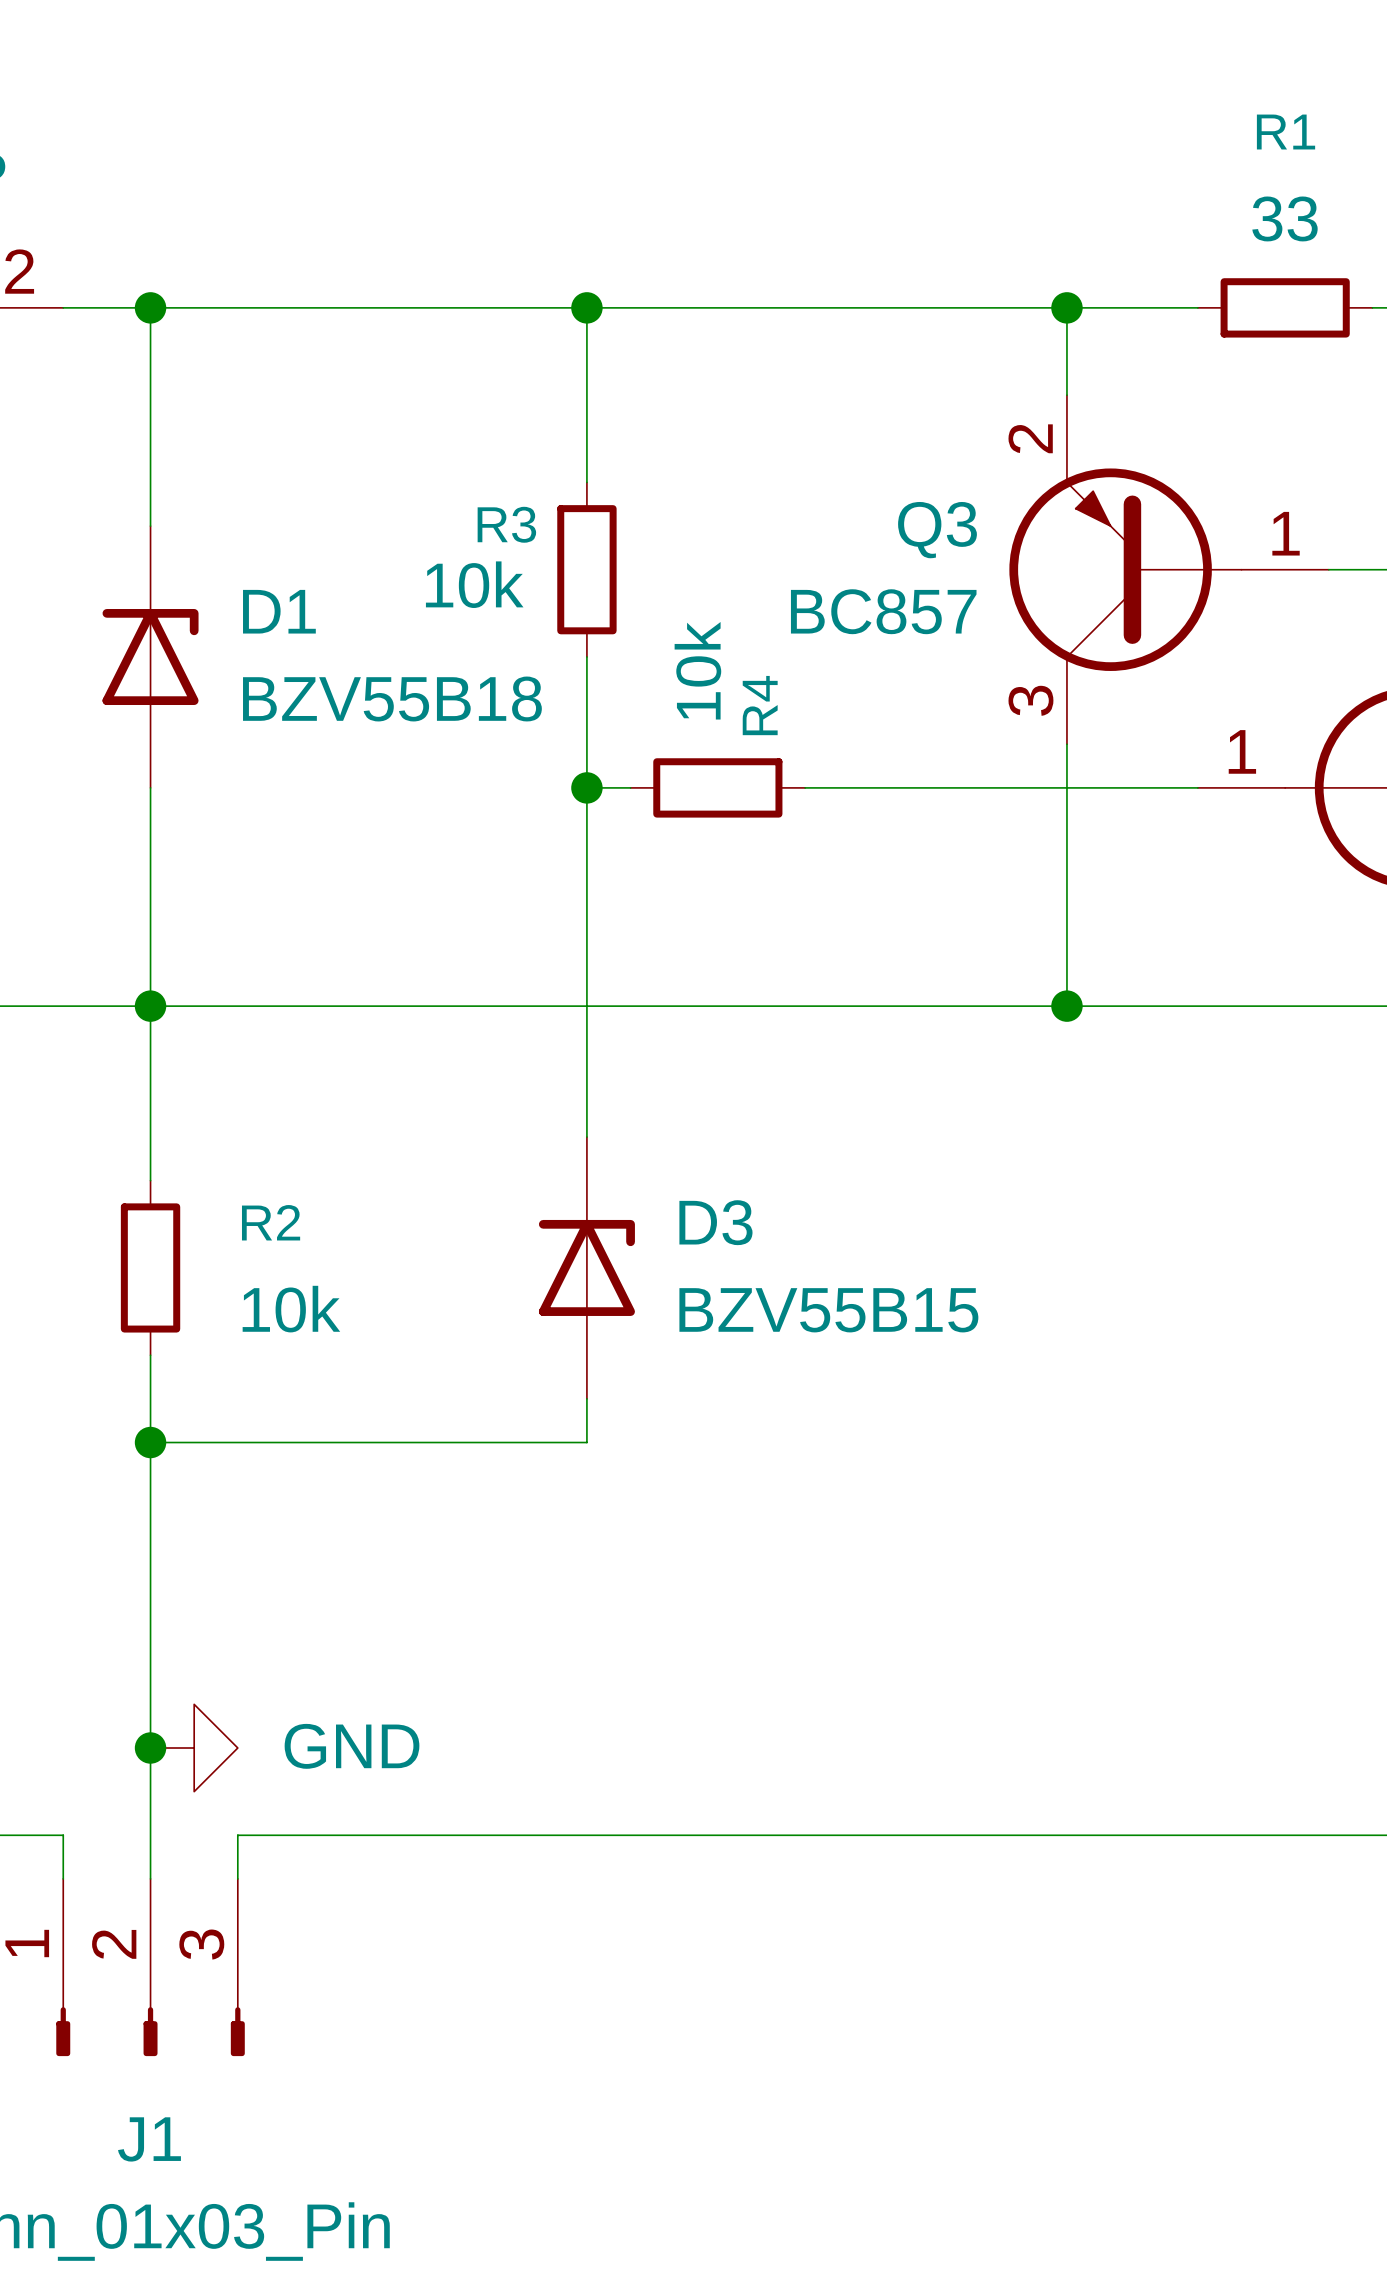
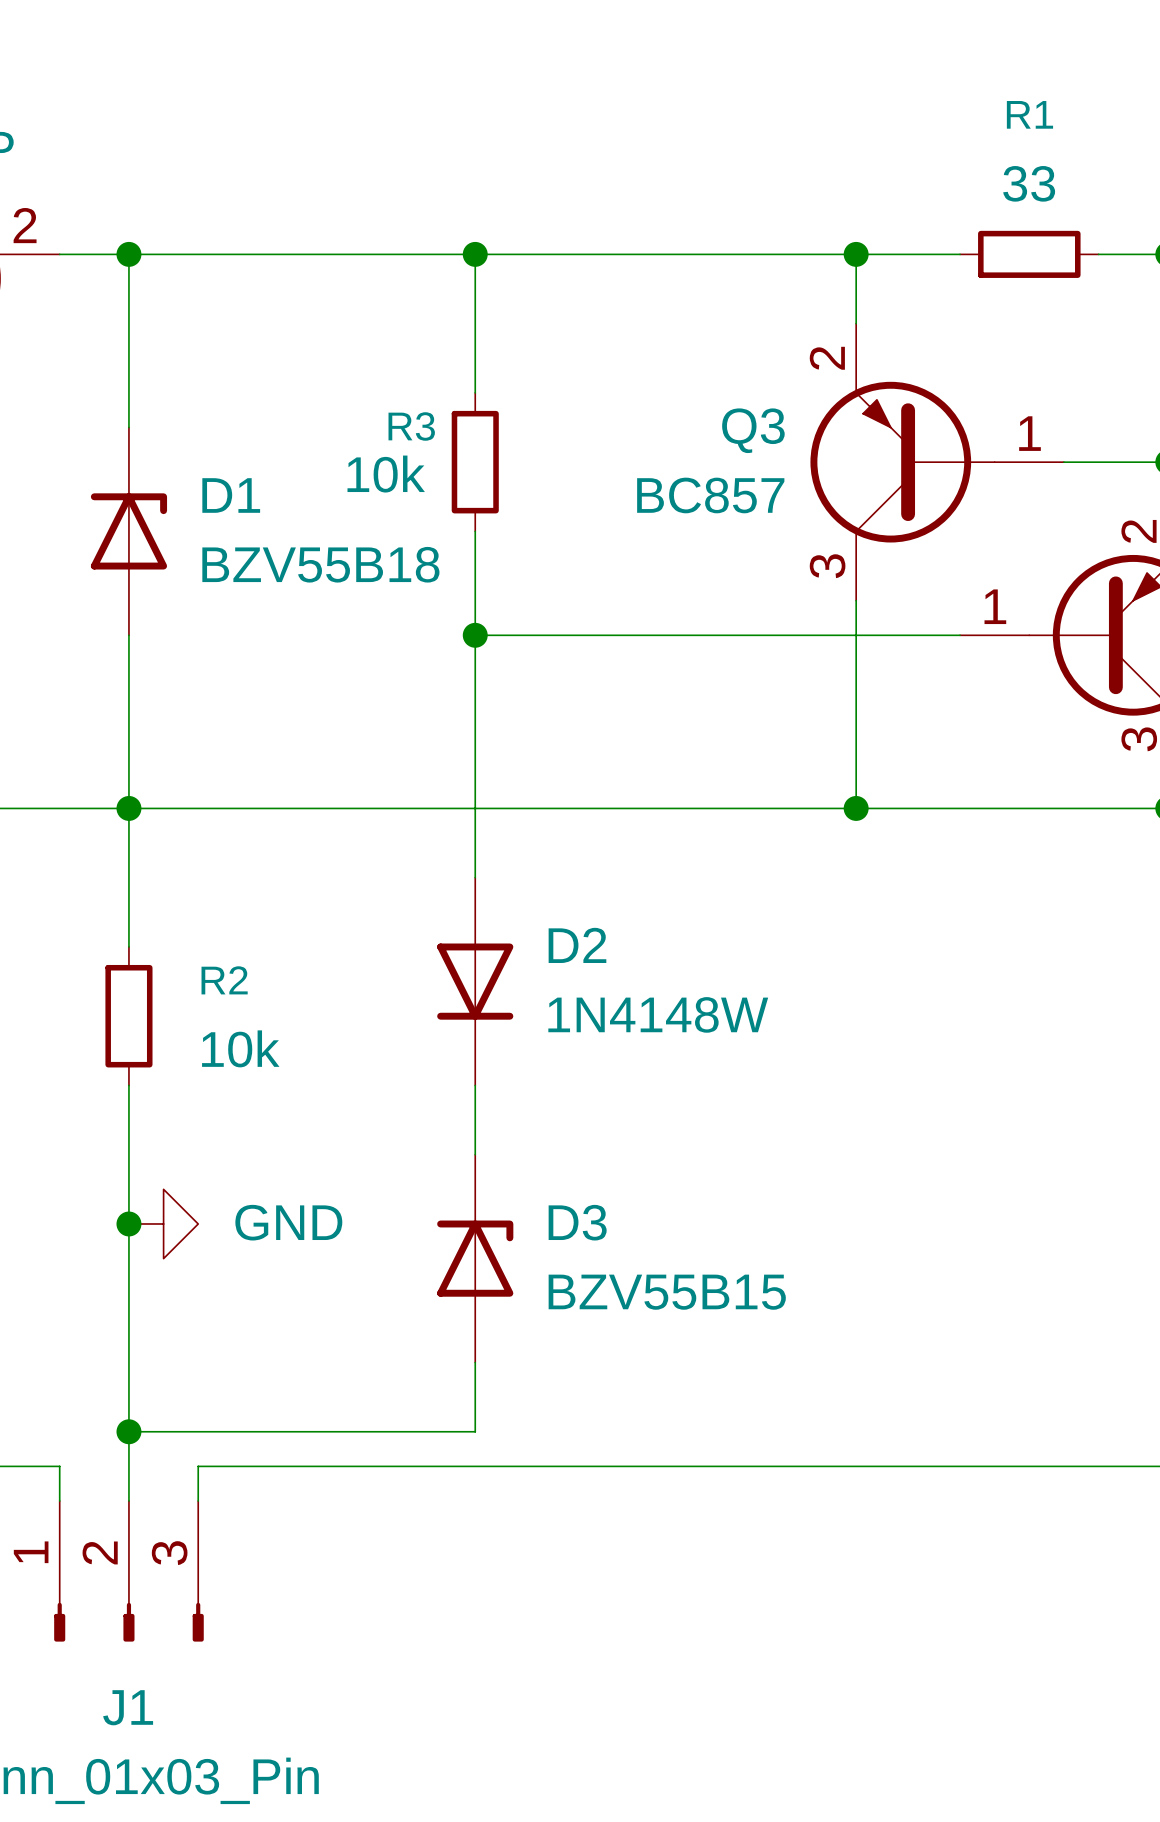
wire: none -> (509, 635) (648, 635)
R4: 10k (717, 787) -> none
D2: none -> 1N4148W (475, 981)
D3 position: (586, 1267) -> (475, 1258)
wire: (150, 1442) (586, 1442) -> none
junction position: (150, 1442) -> (128, 1223)
wire: none -> (475, 1362) (475, 1431) (128, 1431)
junction position: (150, 1748) -> (128, 1431)
power symbol position: GND (194, 1748) -> GND (163, 1223)

